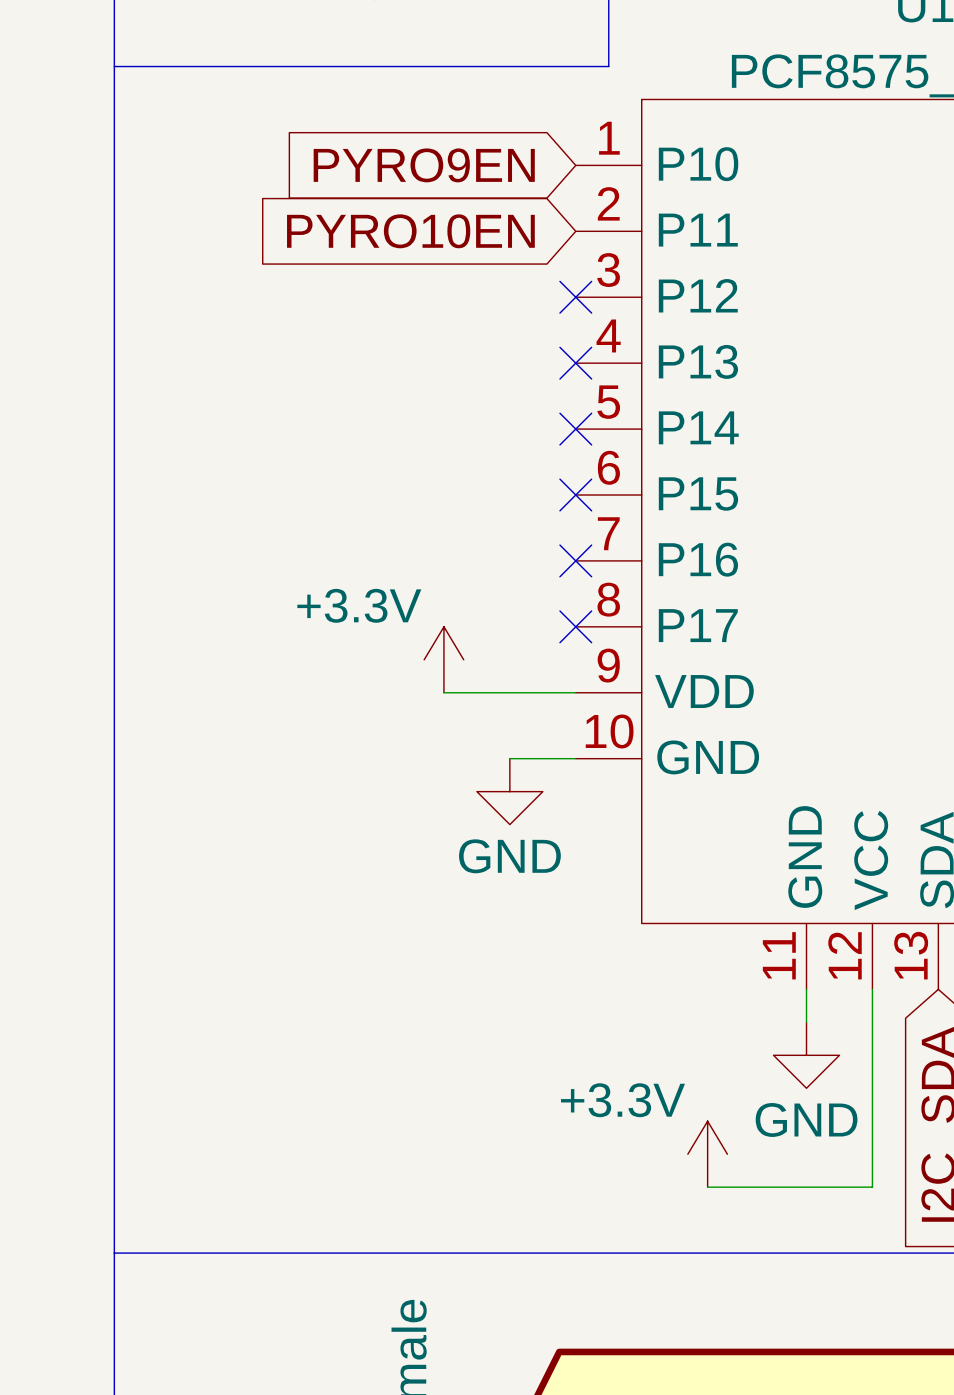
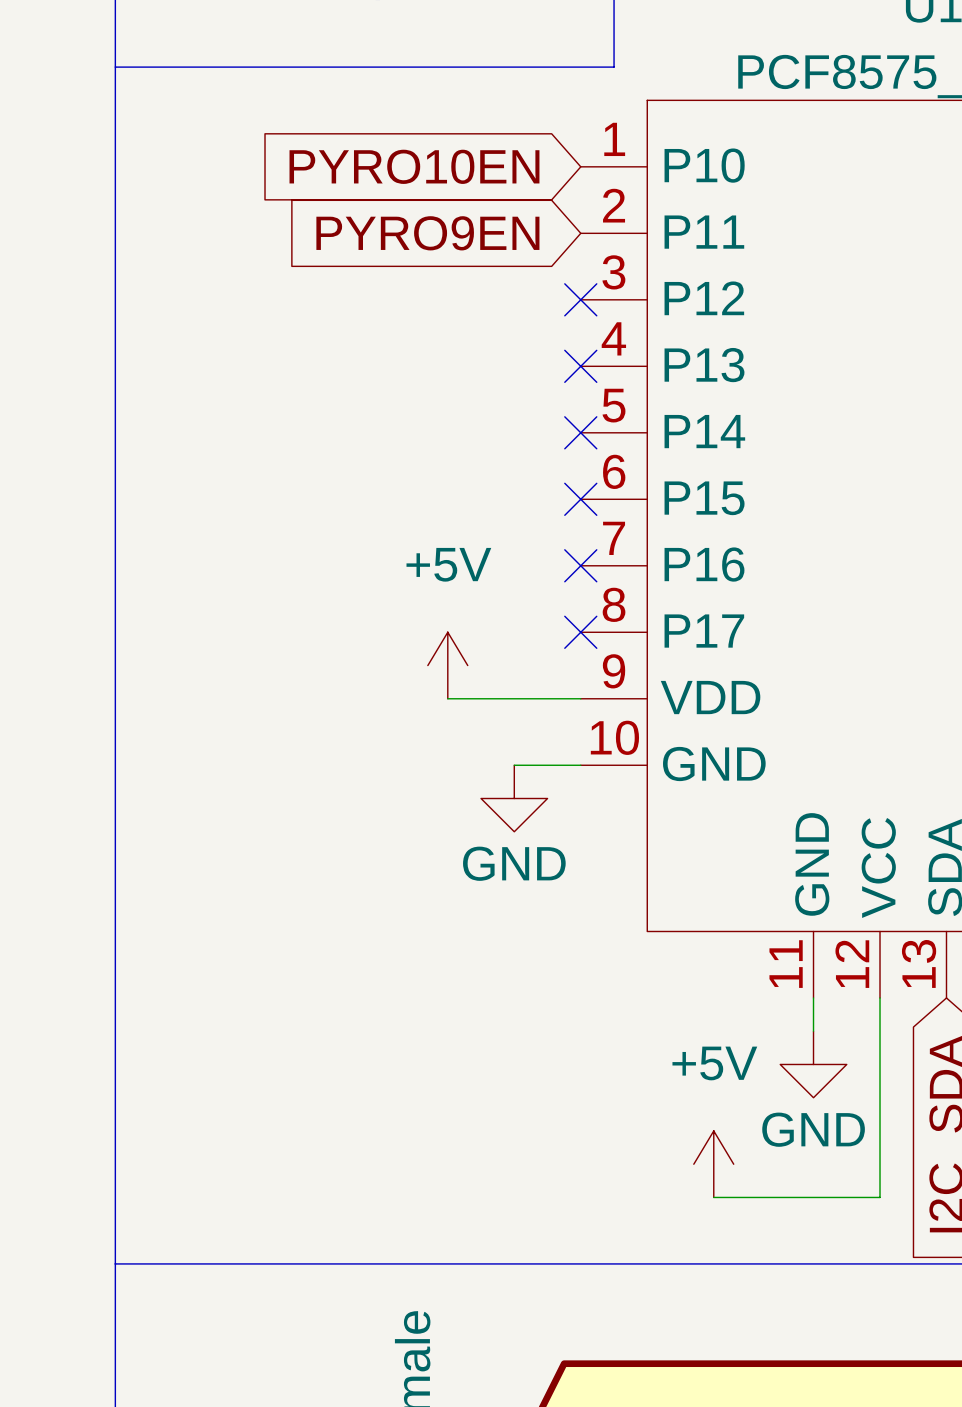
global label: PYRO9EN (424, 165) -> PYRO10EN (414, 166)
global label: PYRO10EN (410, 231) -> PYRO9EN (427, 233)
power symbol: +3.3V (443, 659) -> +5V (447, 665)
power symbol: +3.3V (707, 1154) -> +5V (713, 1164)

